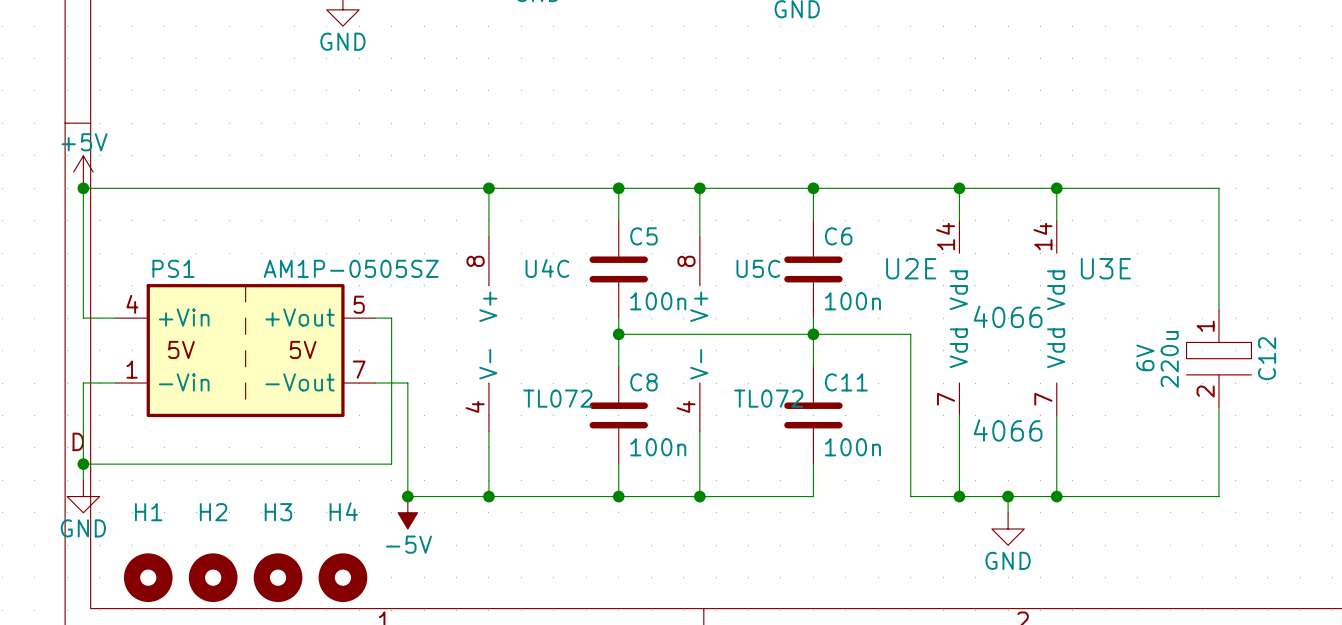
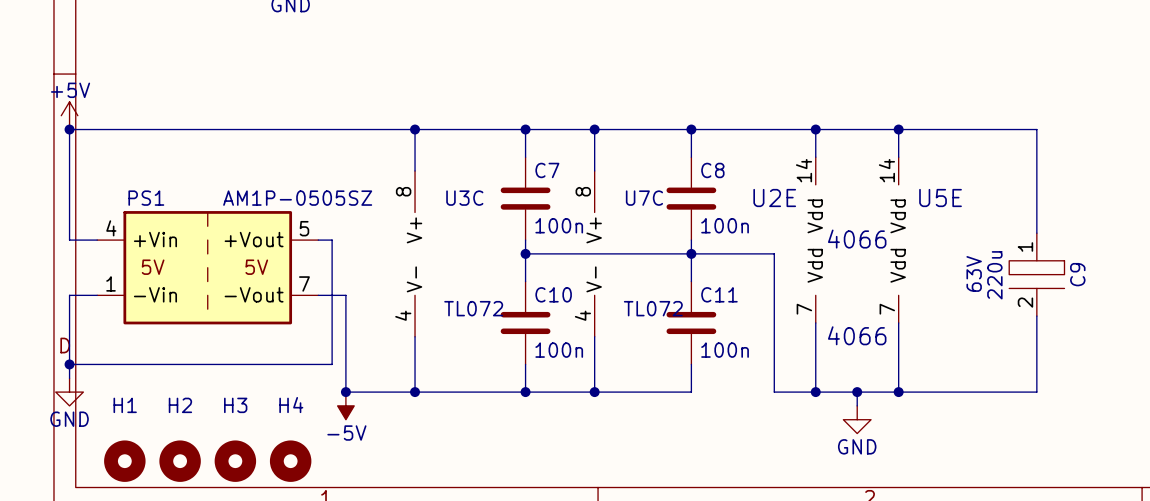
C5 name: C5 (643, 236) -> C7 (547, 170)
C6 name: C6 (838, 236) -> C8 (712, 170)
U4C name: U4C (547, 268) -> U3C (464, 198)
U5C name: U5C (758, 268) -> U7C (644, 198)
U3E name: U3E (1105, 268) -> U5E (940, 198)
C12 text: 6V (1145, 357) -> 63V (974, 273)
C12 name: C12 (1267, 358) -> C9 (1077, 274)
C8 name: C8 (643, 382) -> C10 (553, 294)

